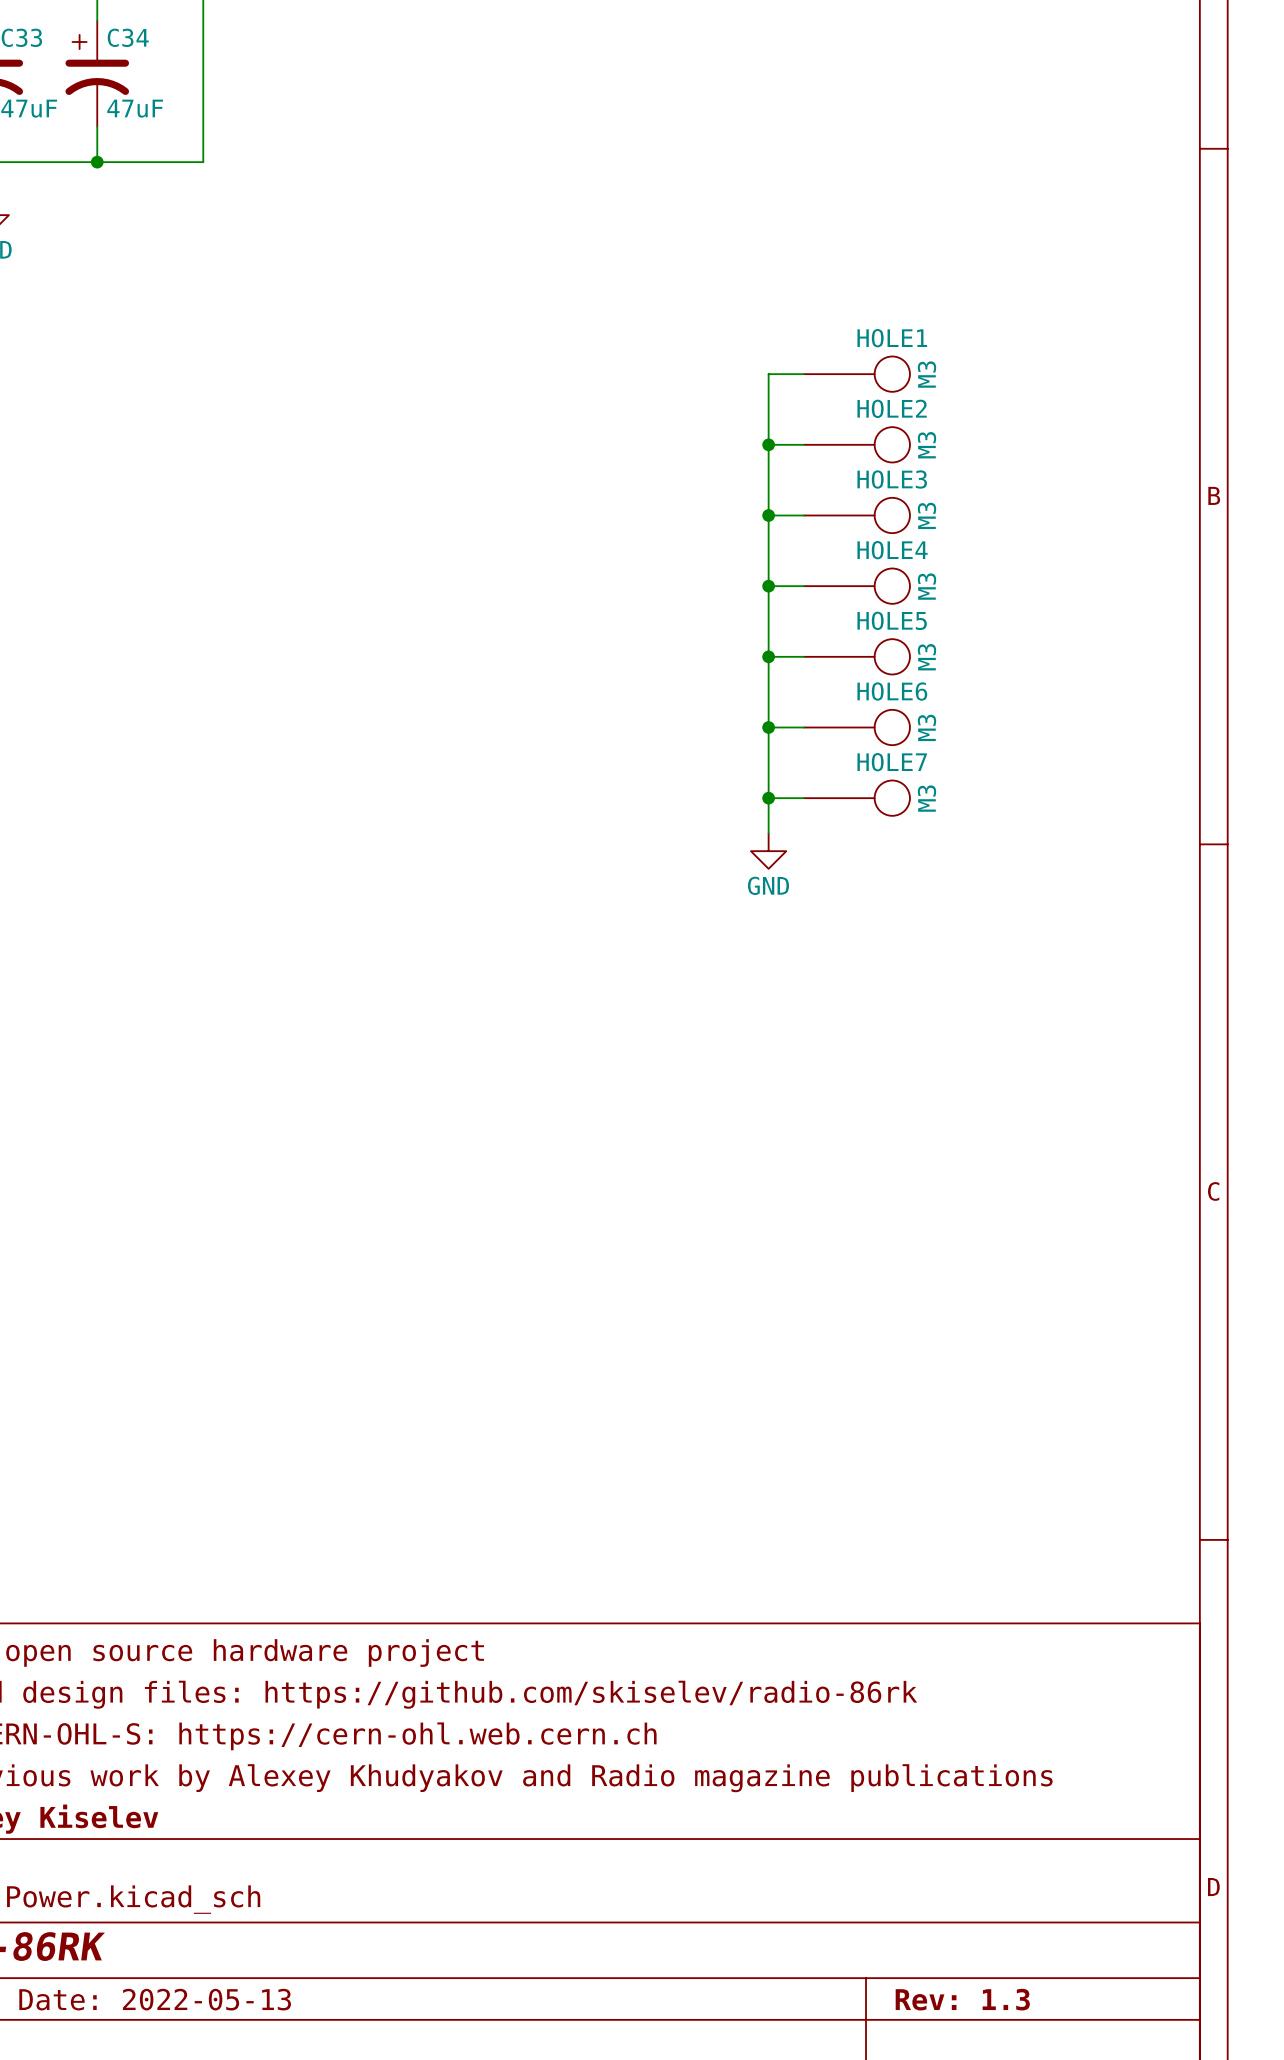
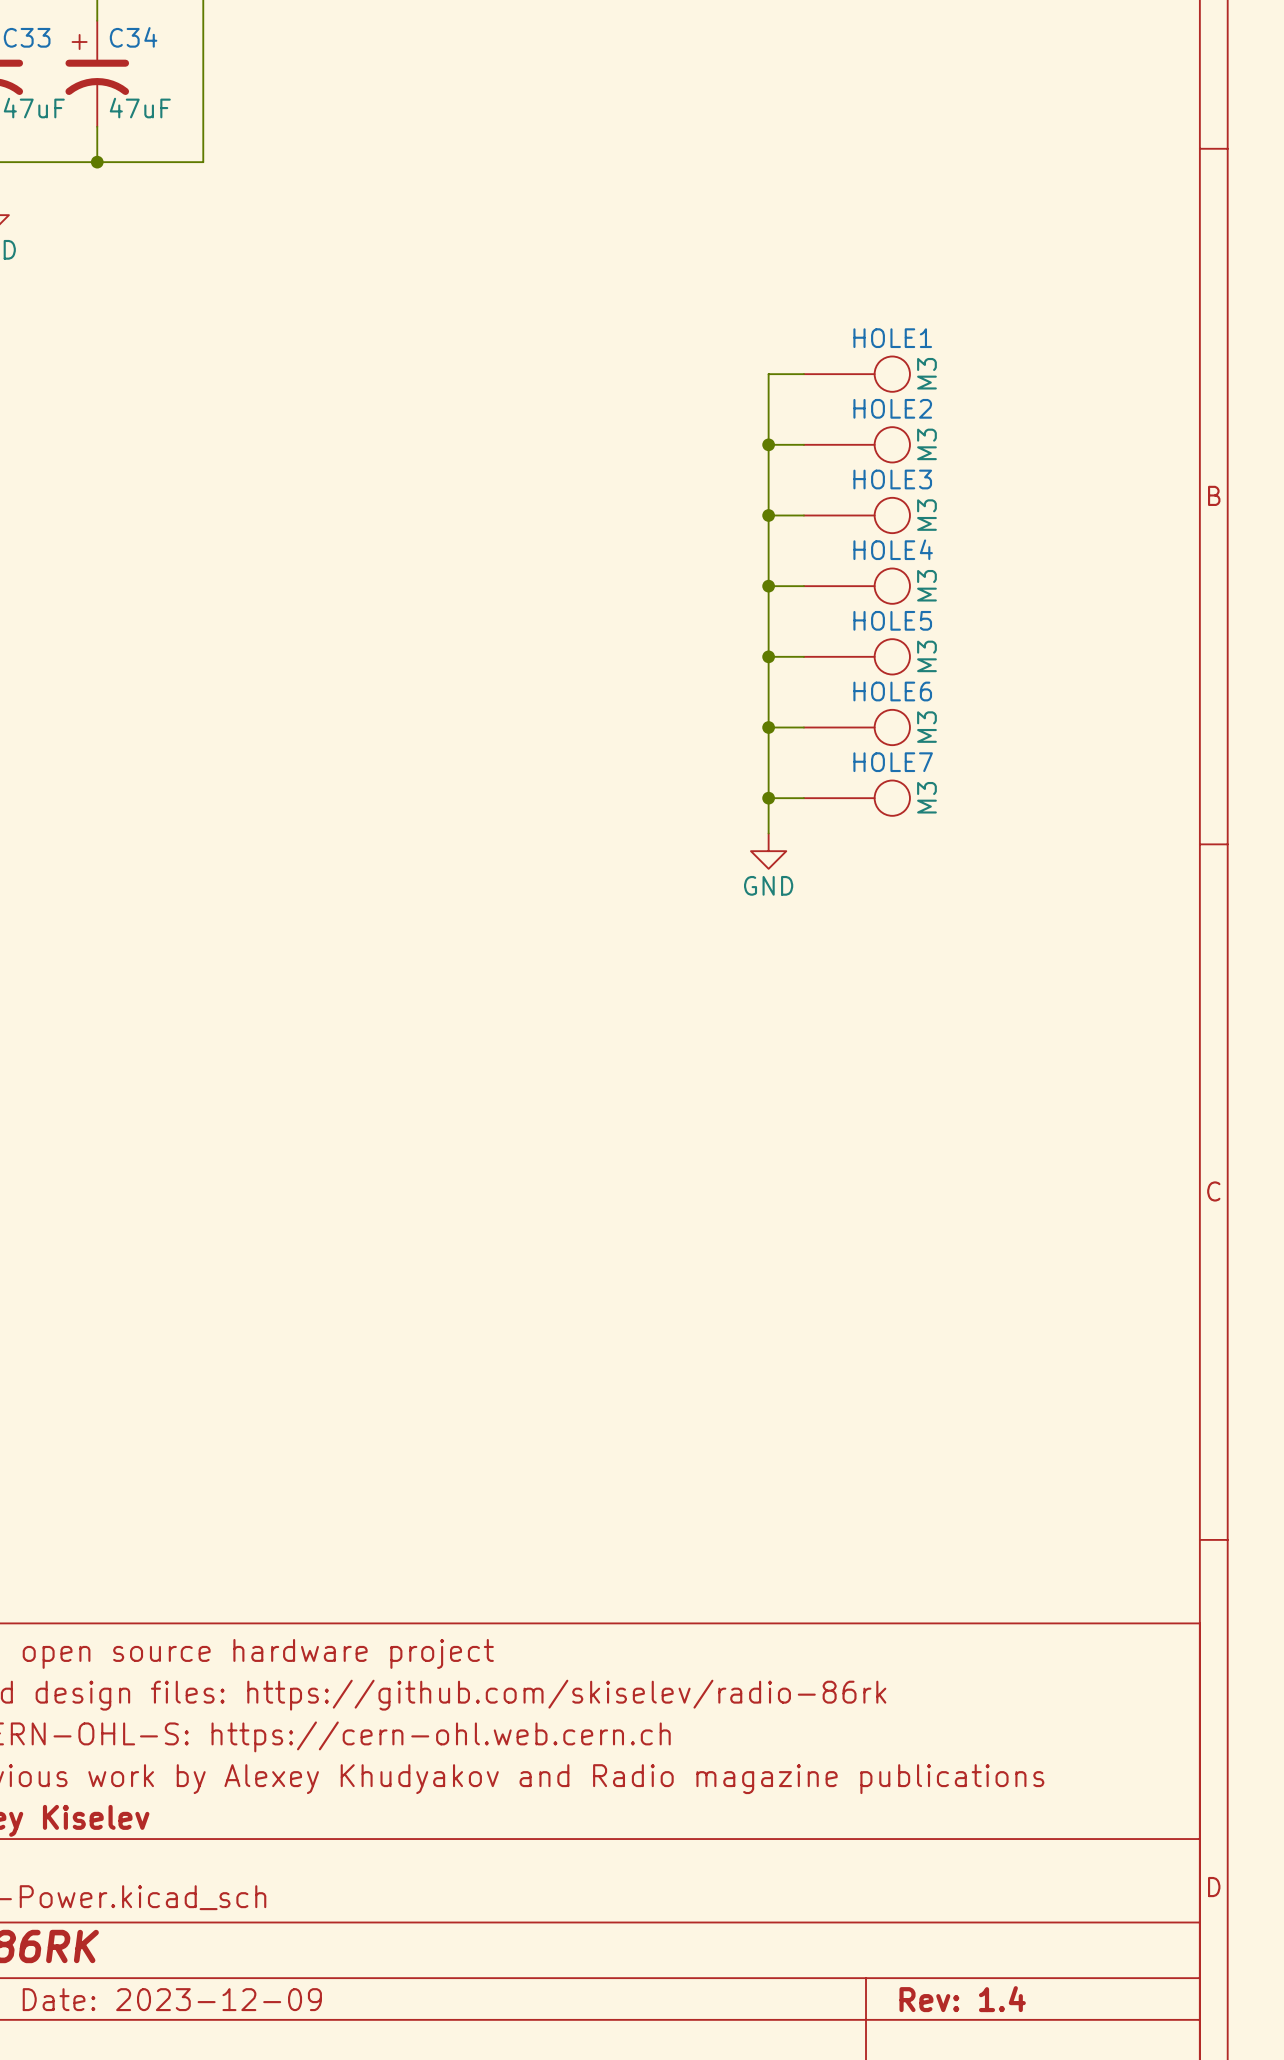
title block: Date: 2022-05-13 (155, 1999) -> Date: 2023-12-09 (172, 1999)
title block: Rev: 1.3 (962, 1999) -> Rev: 1.4 (962, 1999)

